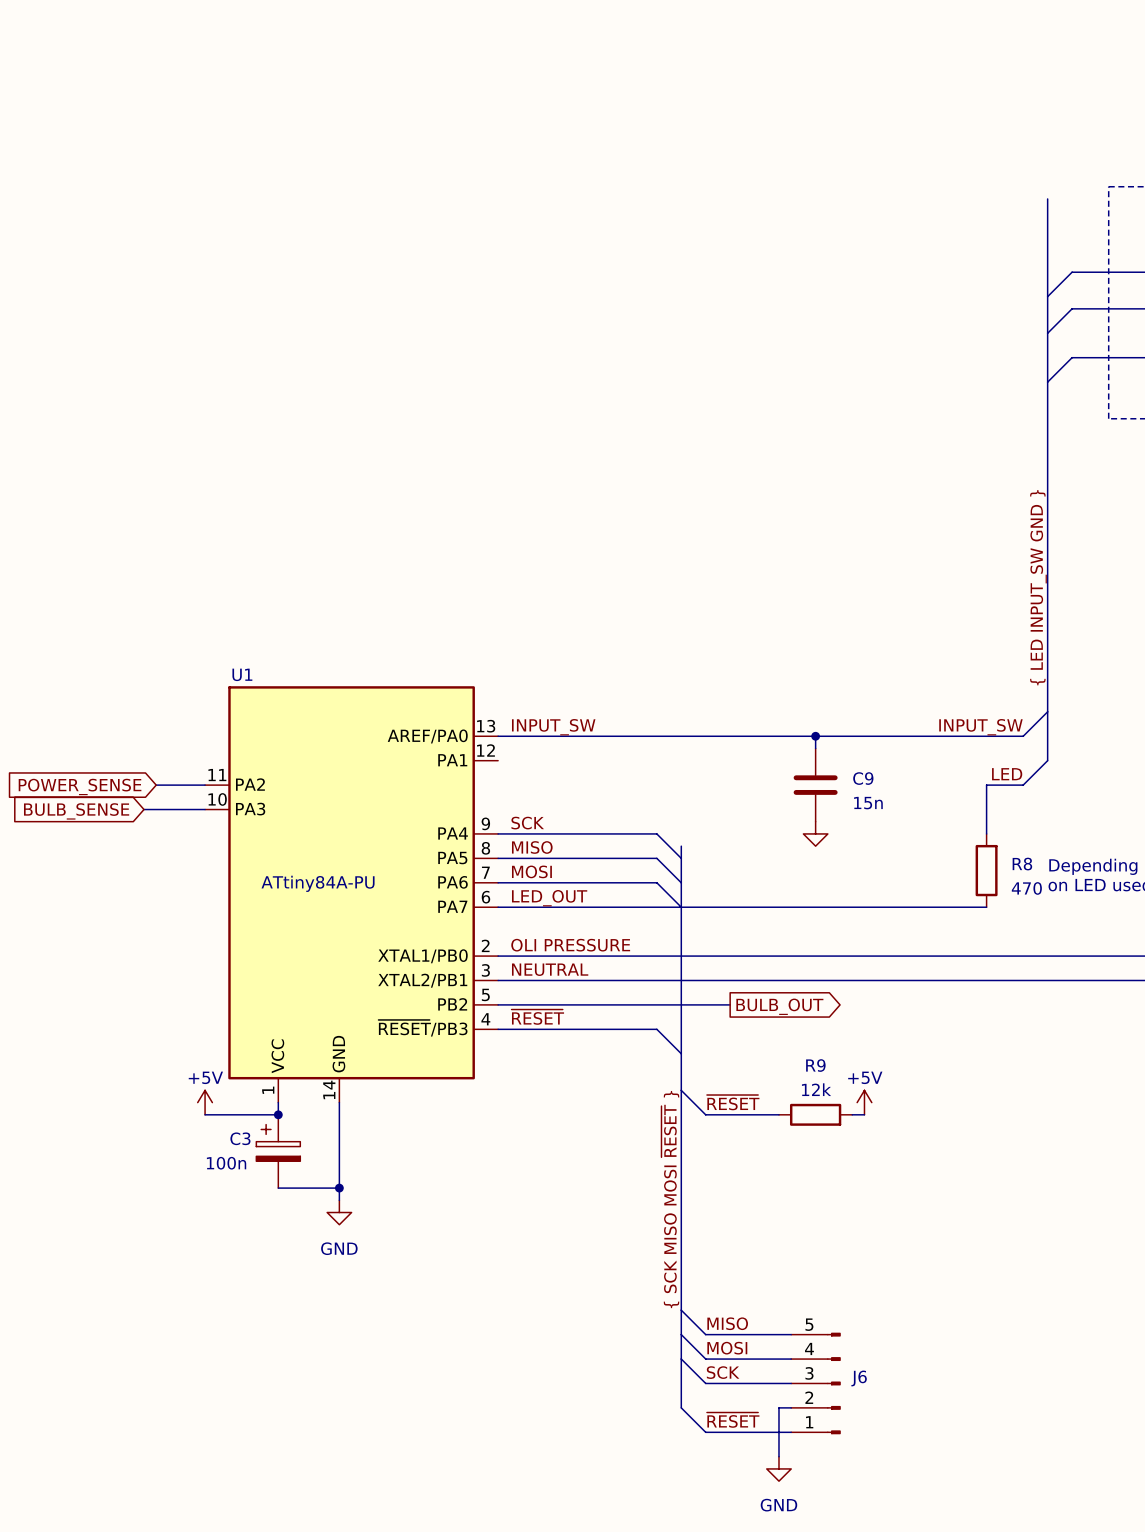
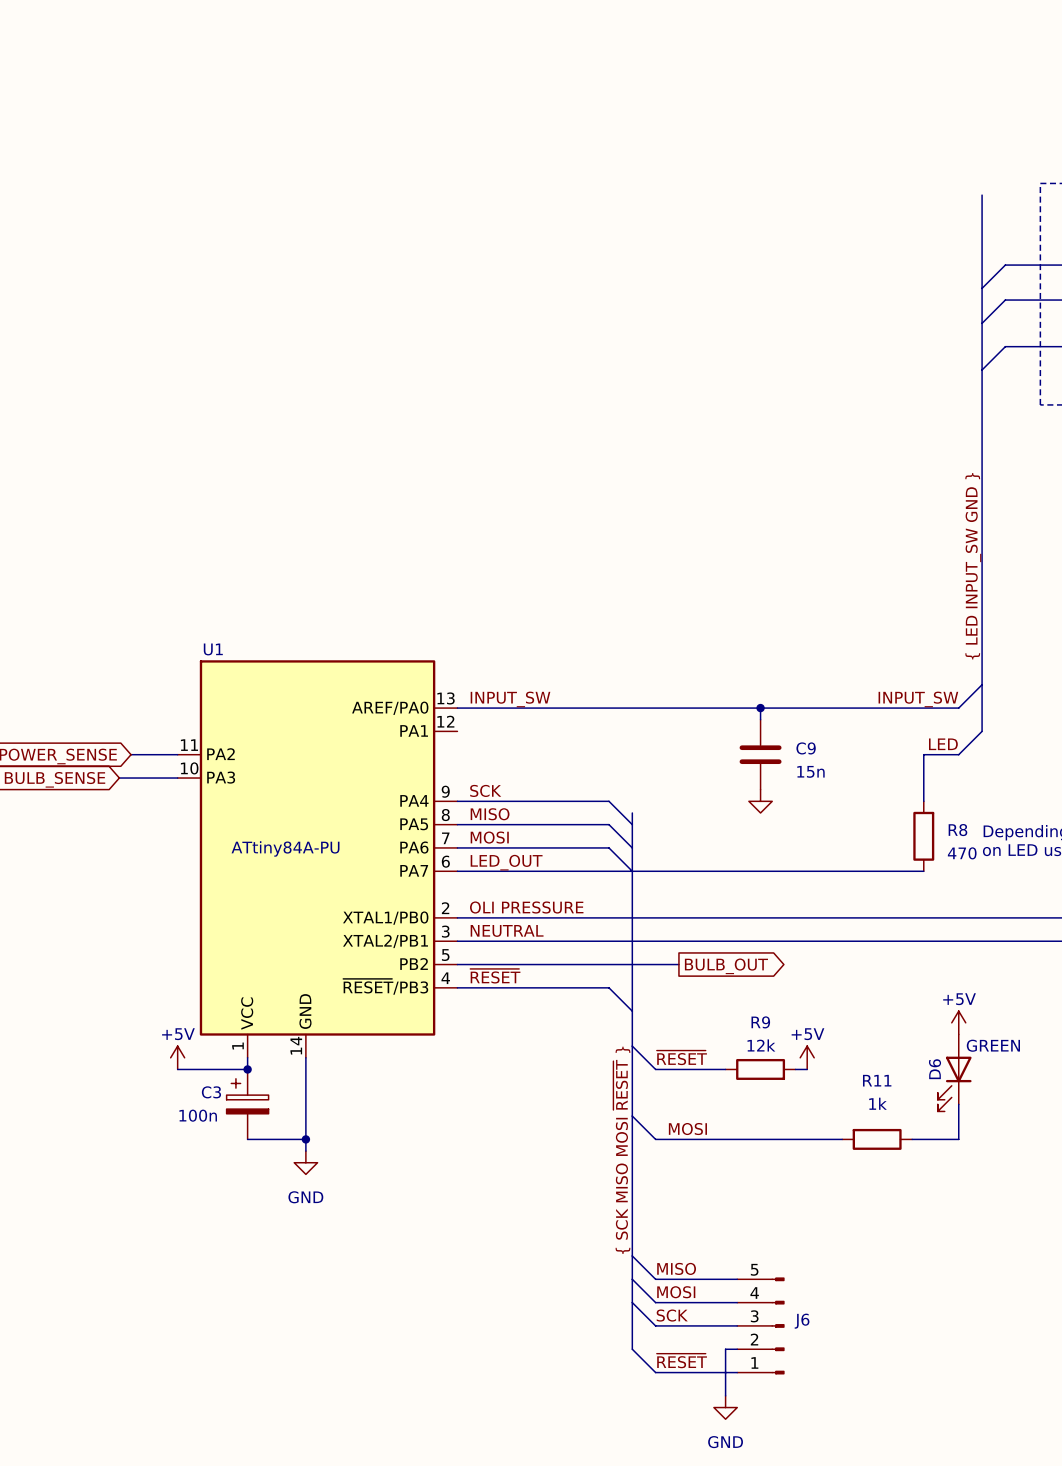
power symbol: none -> +5V (958, 1022)
D6: none -> GREEN (954, 1072)
wire: none -> (958, 1104) (958, 1139) (912, 1139)
wire: none -> (632, 1116) (655, 1139) (842, 1139)
label: none -> MOSI (687, 1129)
R11: none -> 1k (877, 1139)

